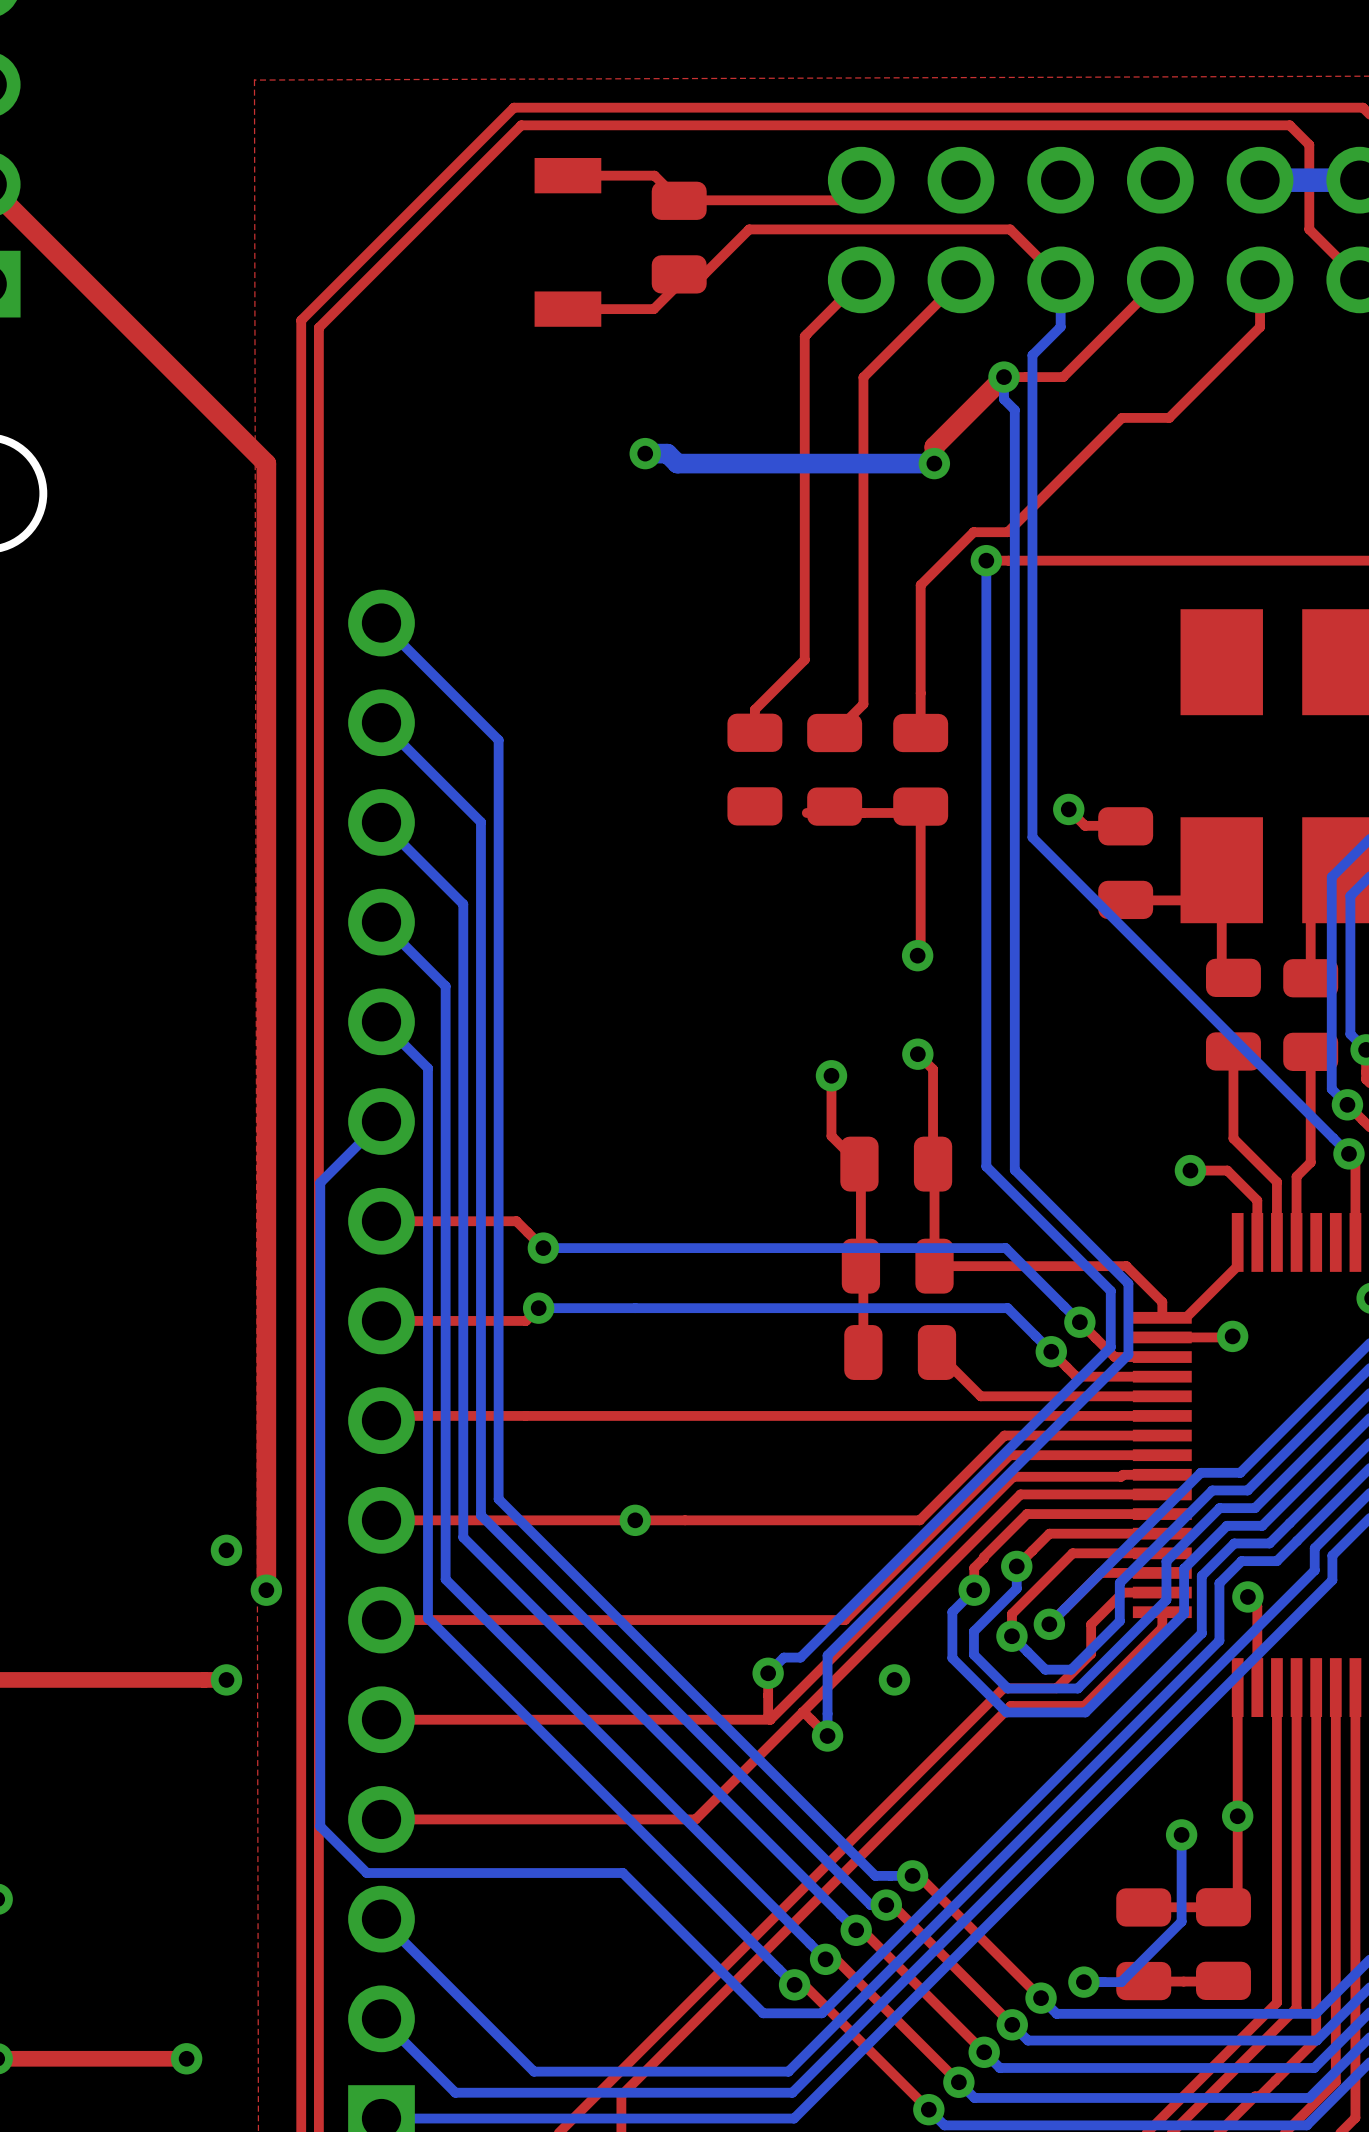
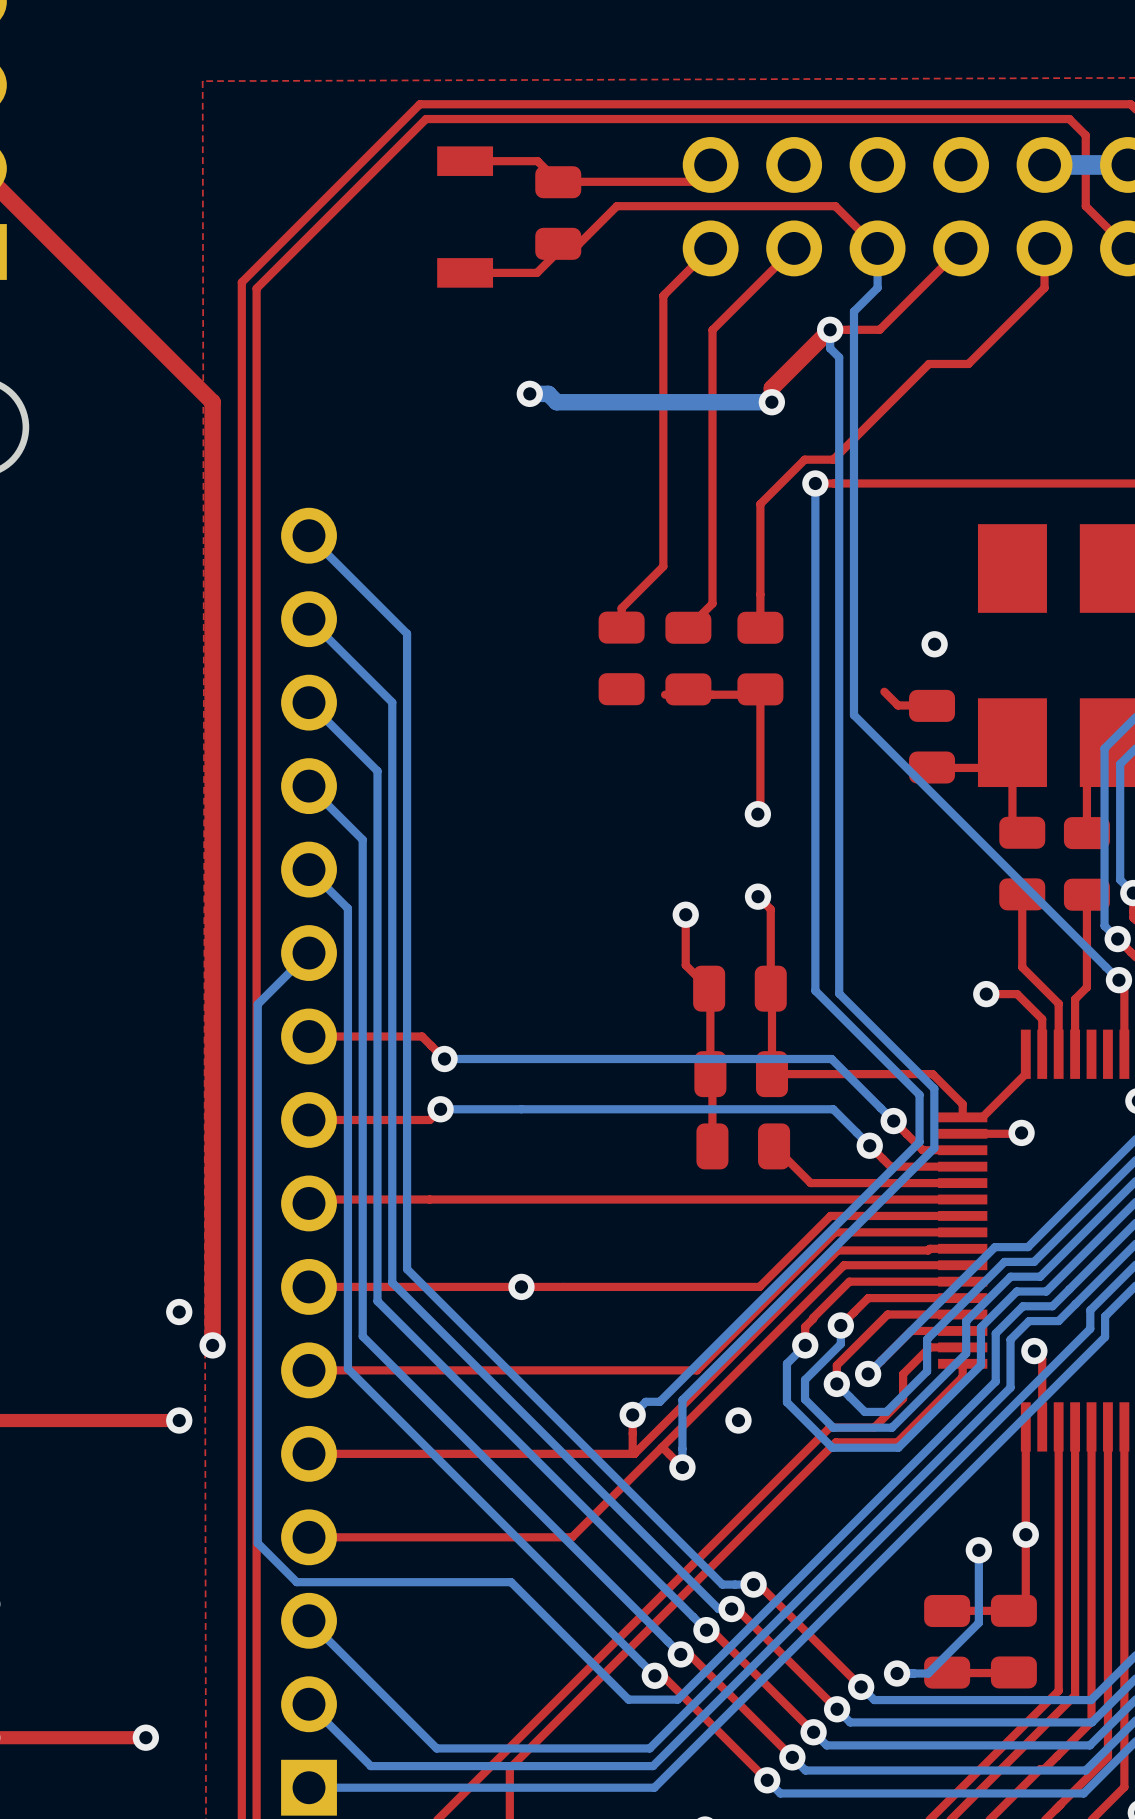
via position: (1068, 809) -> (934, 644)

